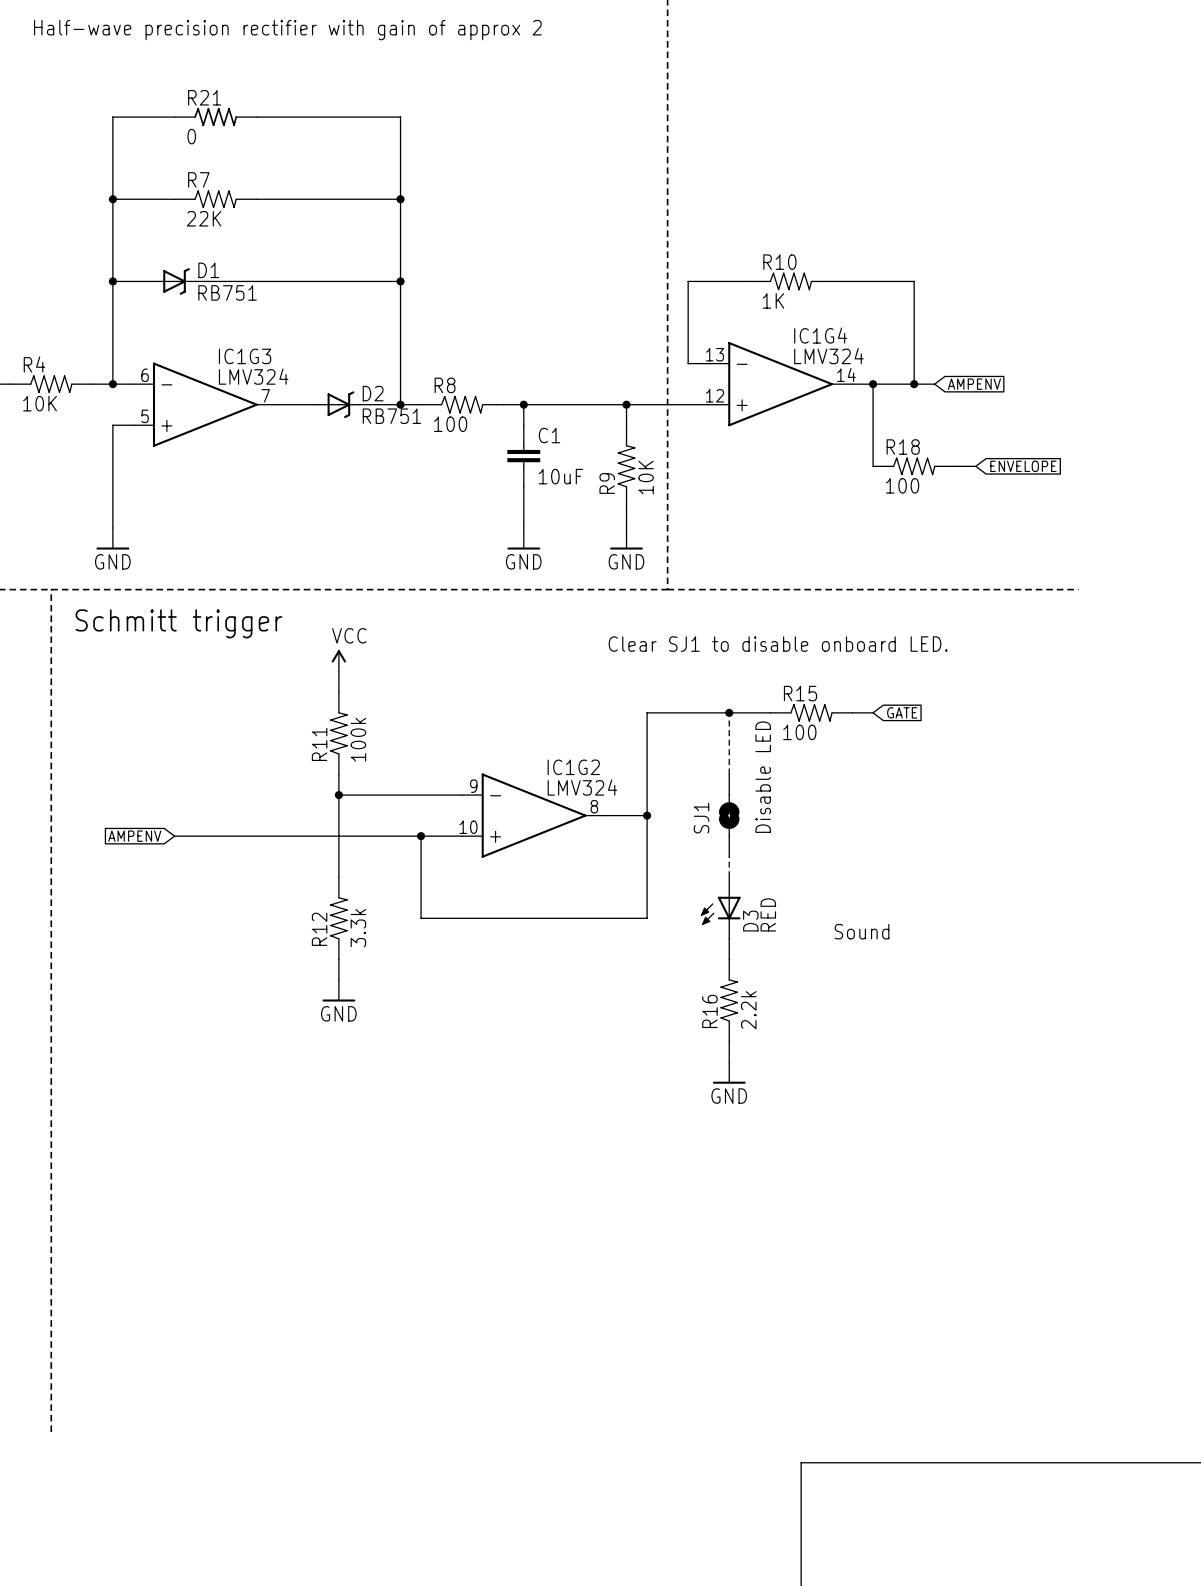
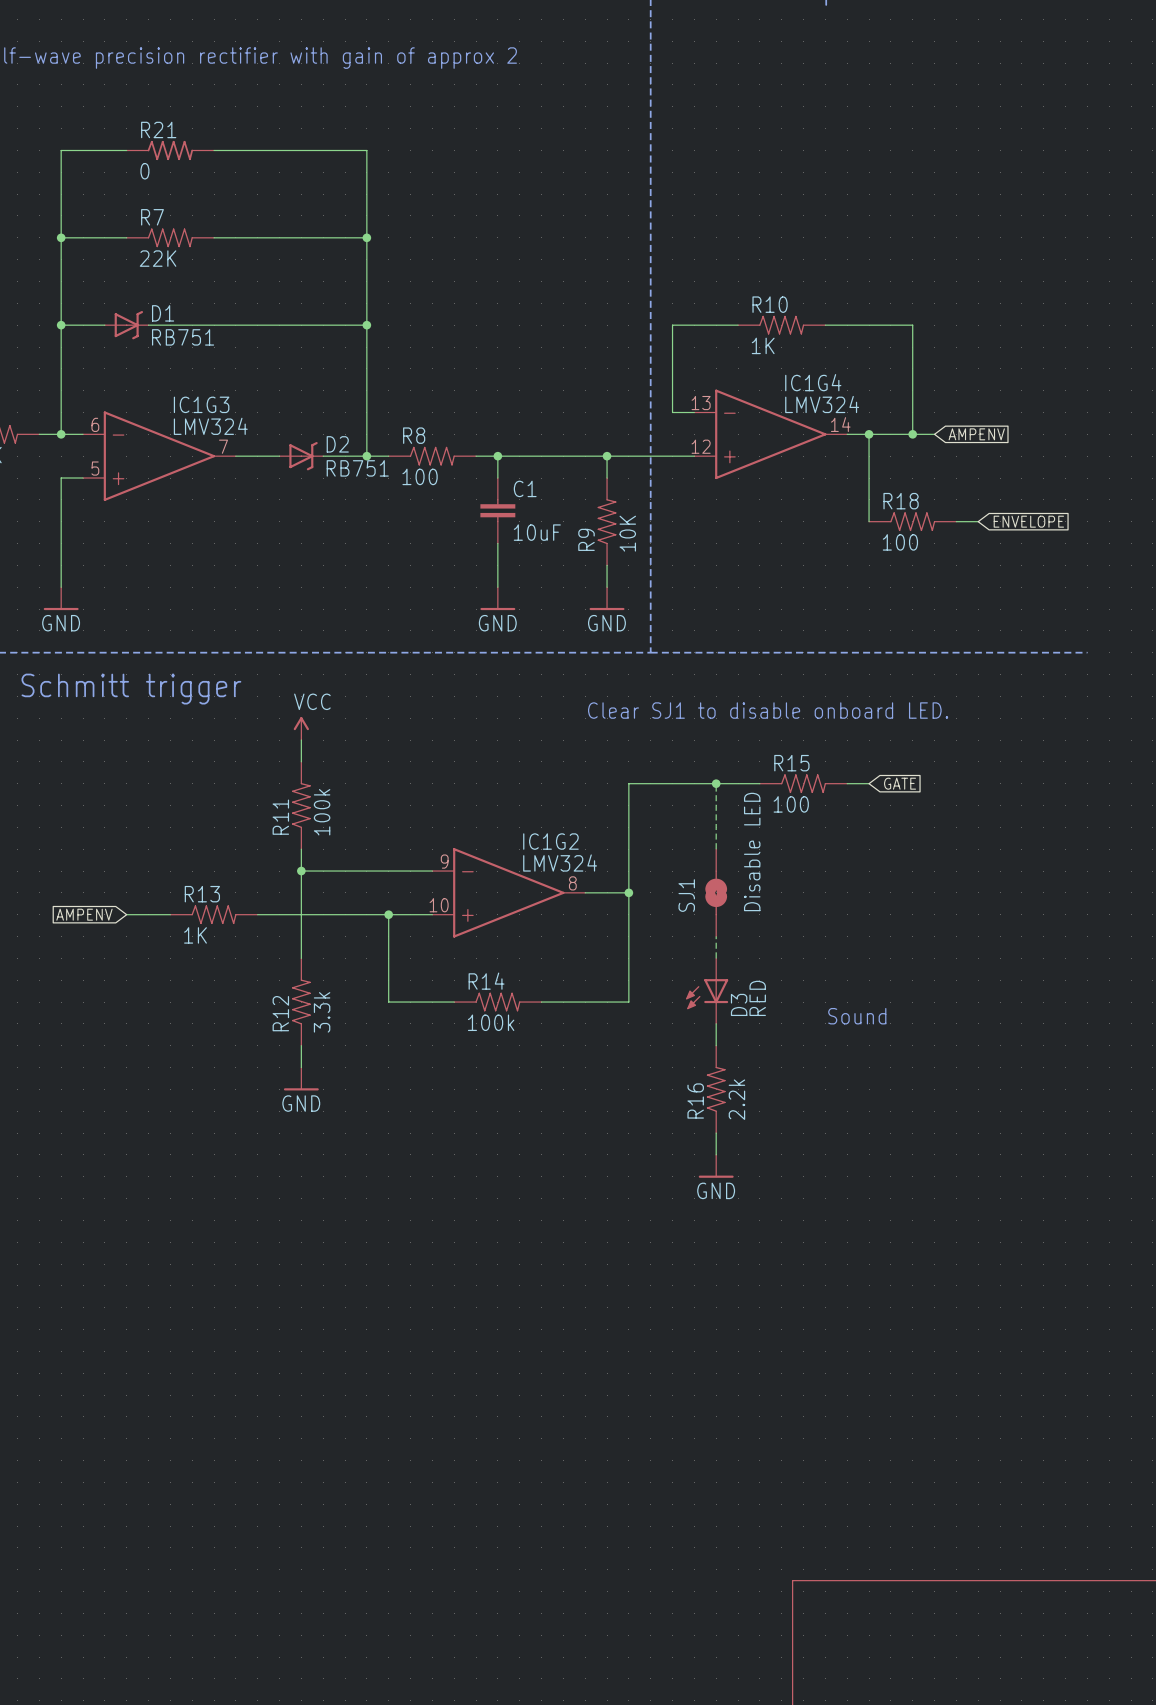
R13: none -> 1K (214, 914)
R14: none -> 100k (497, 1002)

